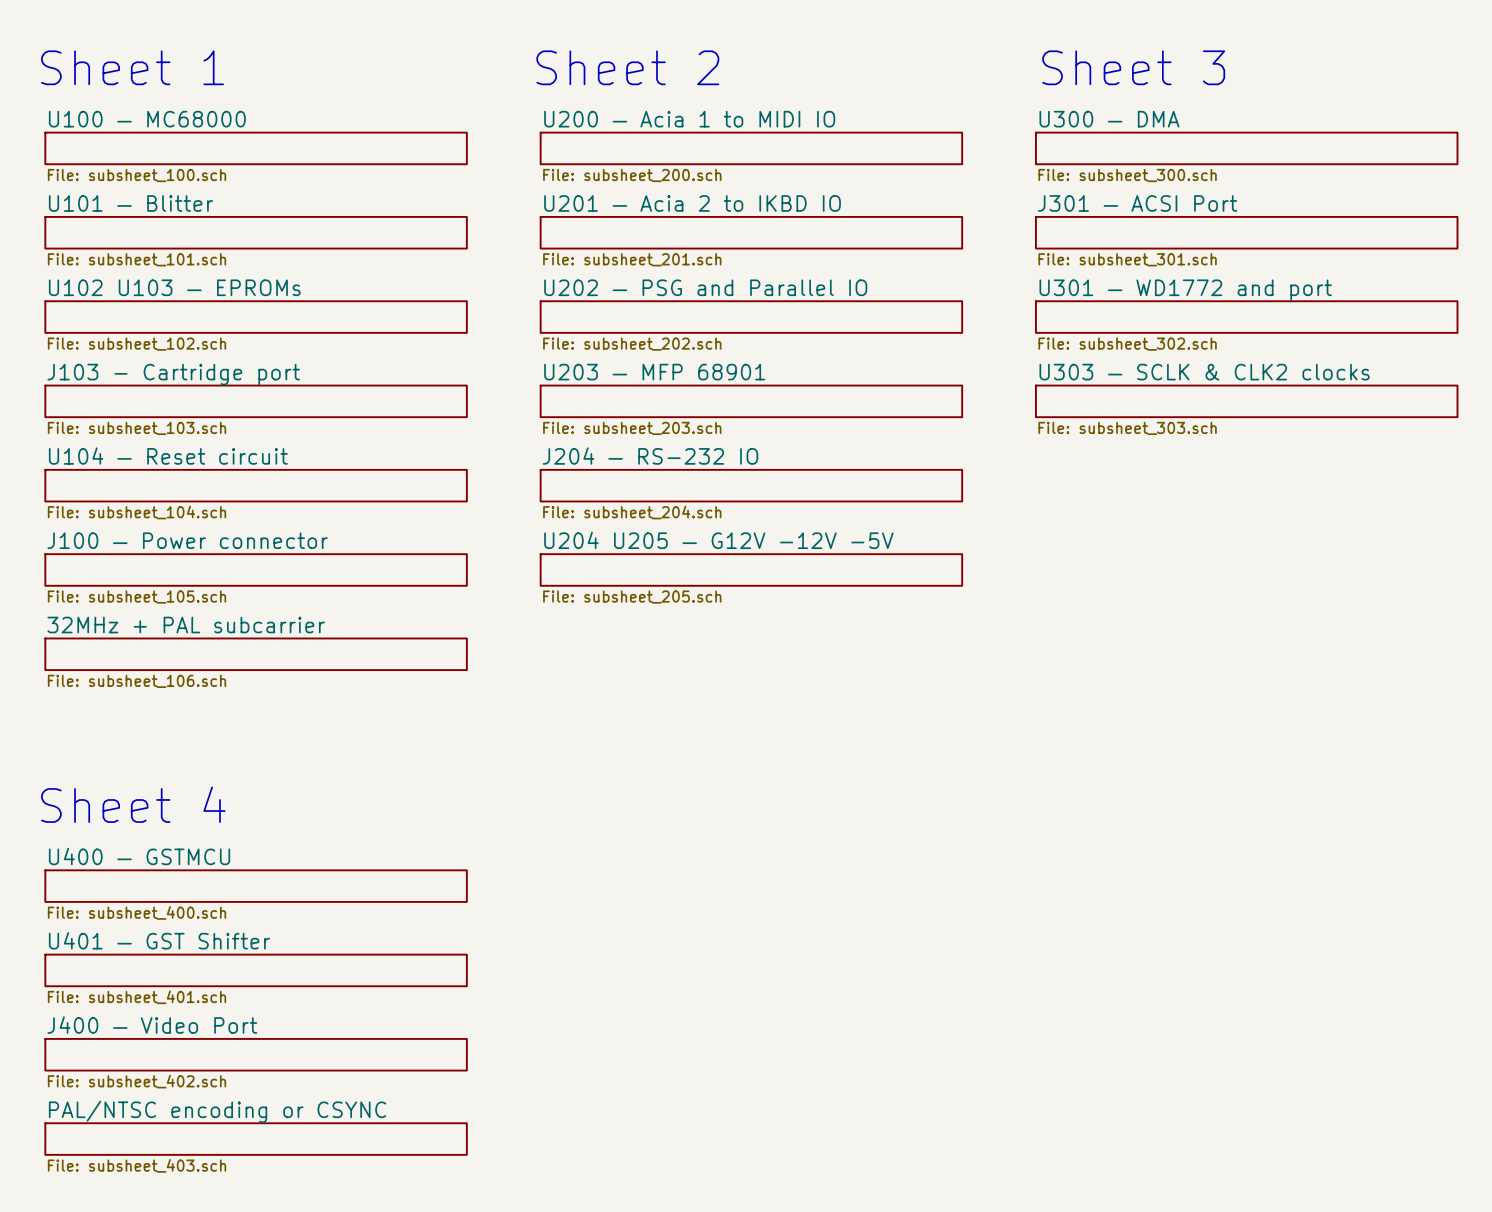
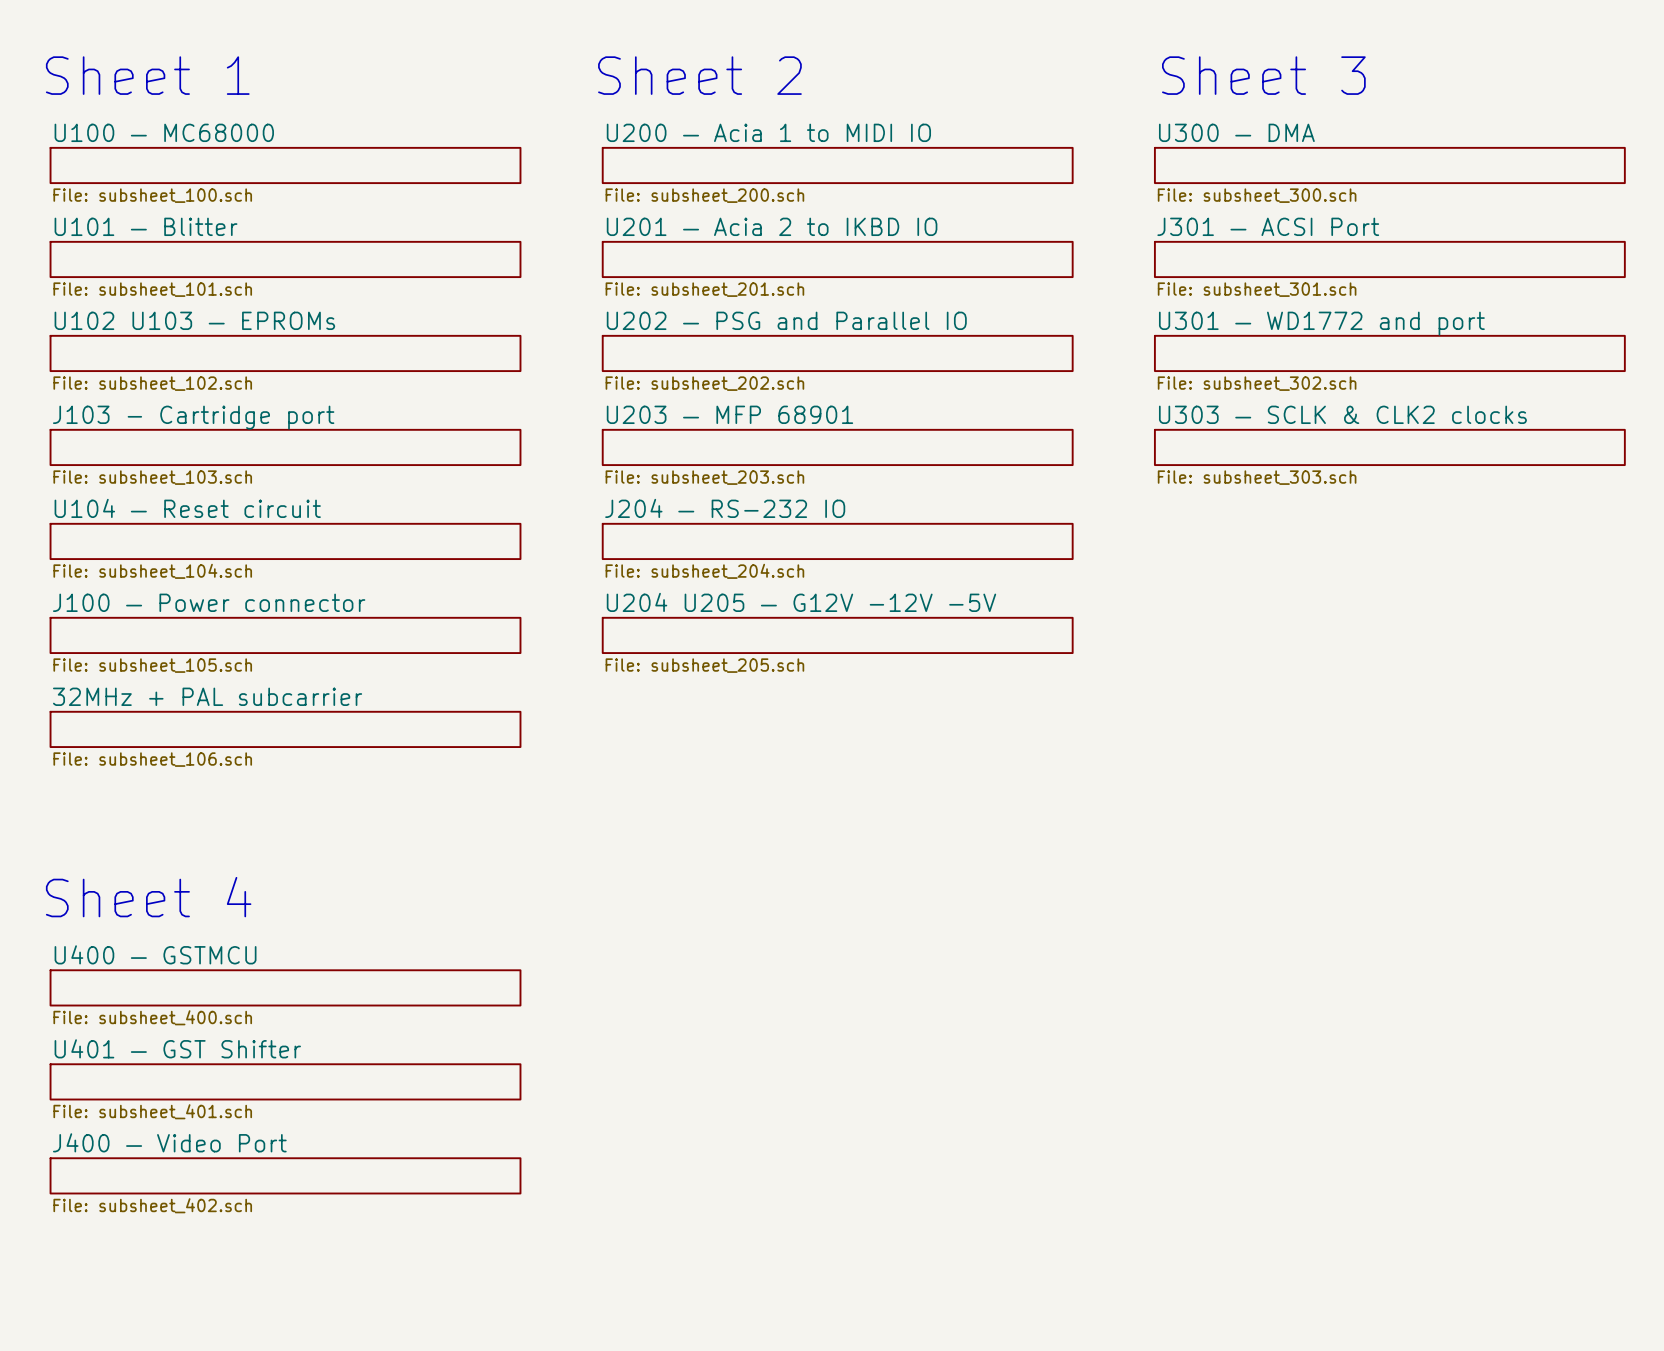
sheet PAL/NTSC encoding or CSYNC: File: subsheet_403.sch (256, 1139) -> none

